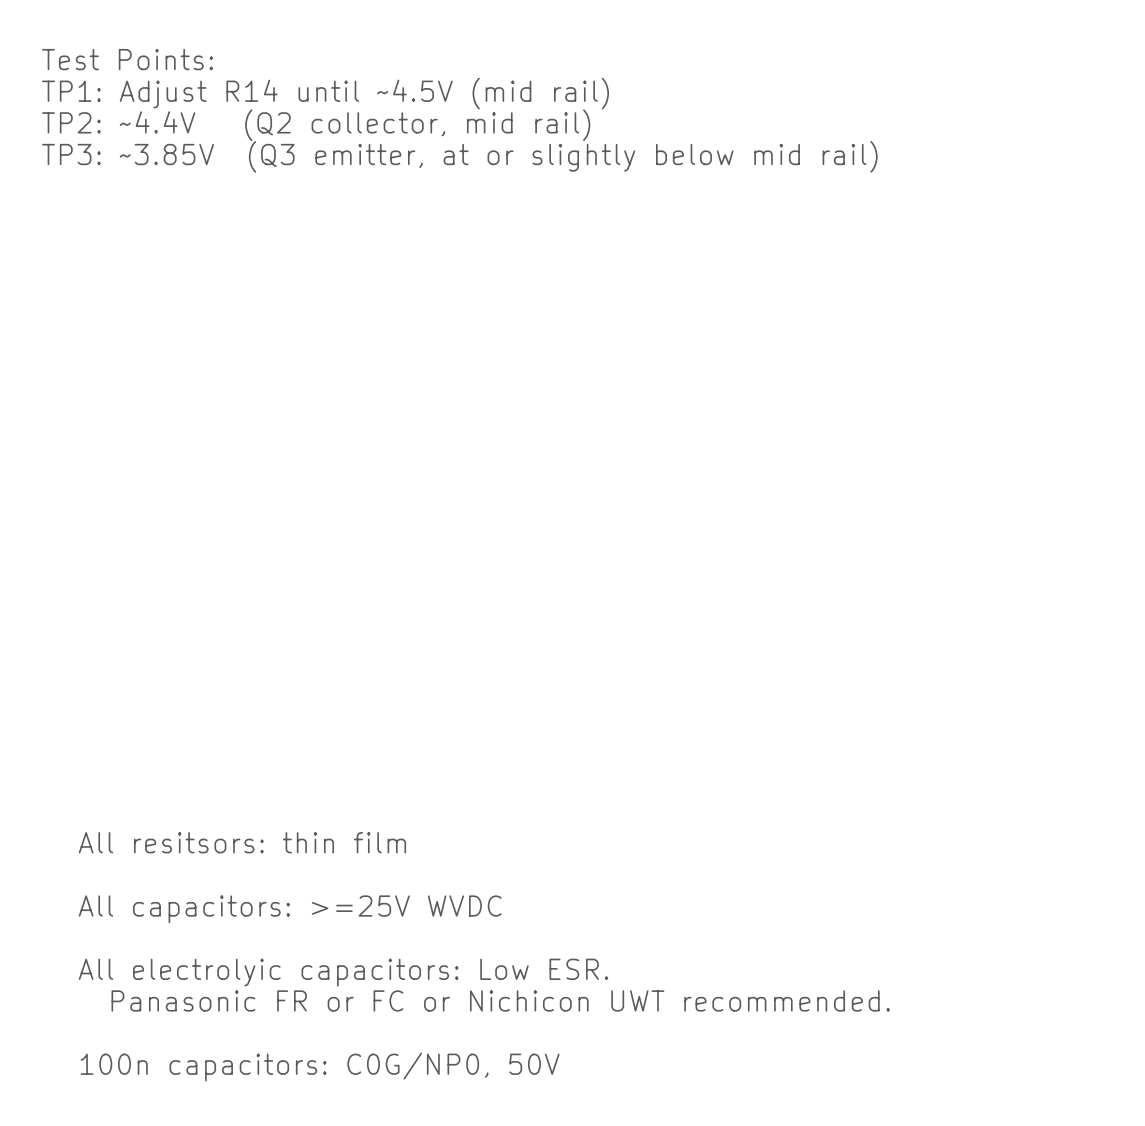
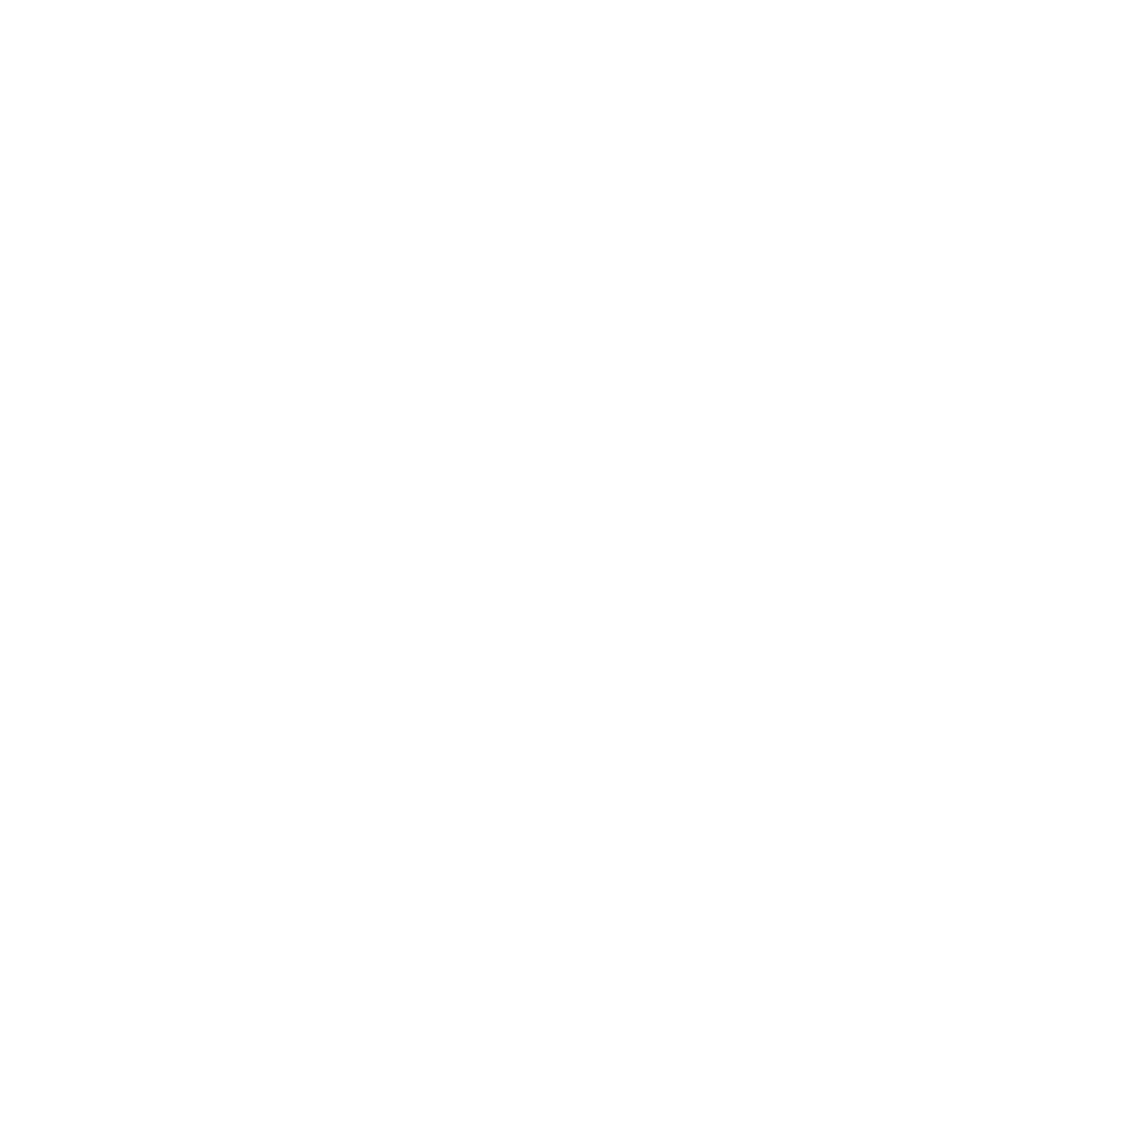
text: Test Points: (127, 59) -> none
text: TP1: Adjust R14 until ~4.5V (mid rail) (325, 93) -> none
text: TP2: ~4.4V (Q2 collector, mid rail) (316, 125) -> none
text: TP3: ~3.85V (Q3 emitter, at or slightly below mid rail) (459, 156) -> none
text: All resitsors: thin film (242, 842) -> none
text: All capacitors: >=25V WVDC (290, 909) -> none
text: All electrolyic capacitors: Low ESR. (343, 972) -> none
text: Panasonic FR or FC or Nichicon UWT recommended. (500, 1000) -> none
text: 100n capacitors: C0G/NP0, 50V (320, 1067) -> none

